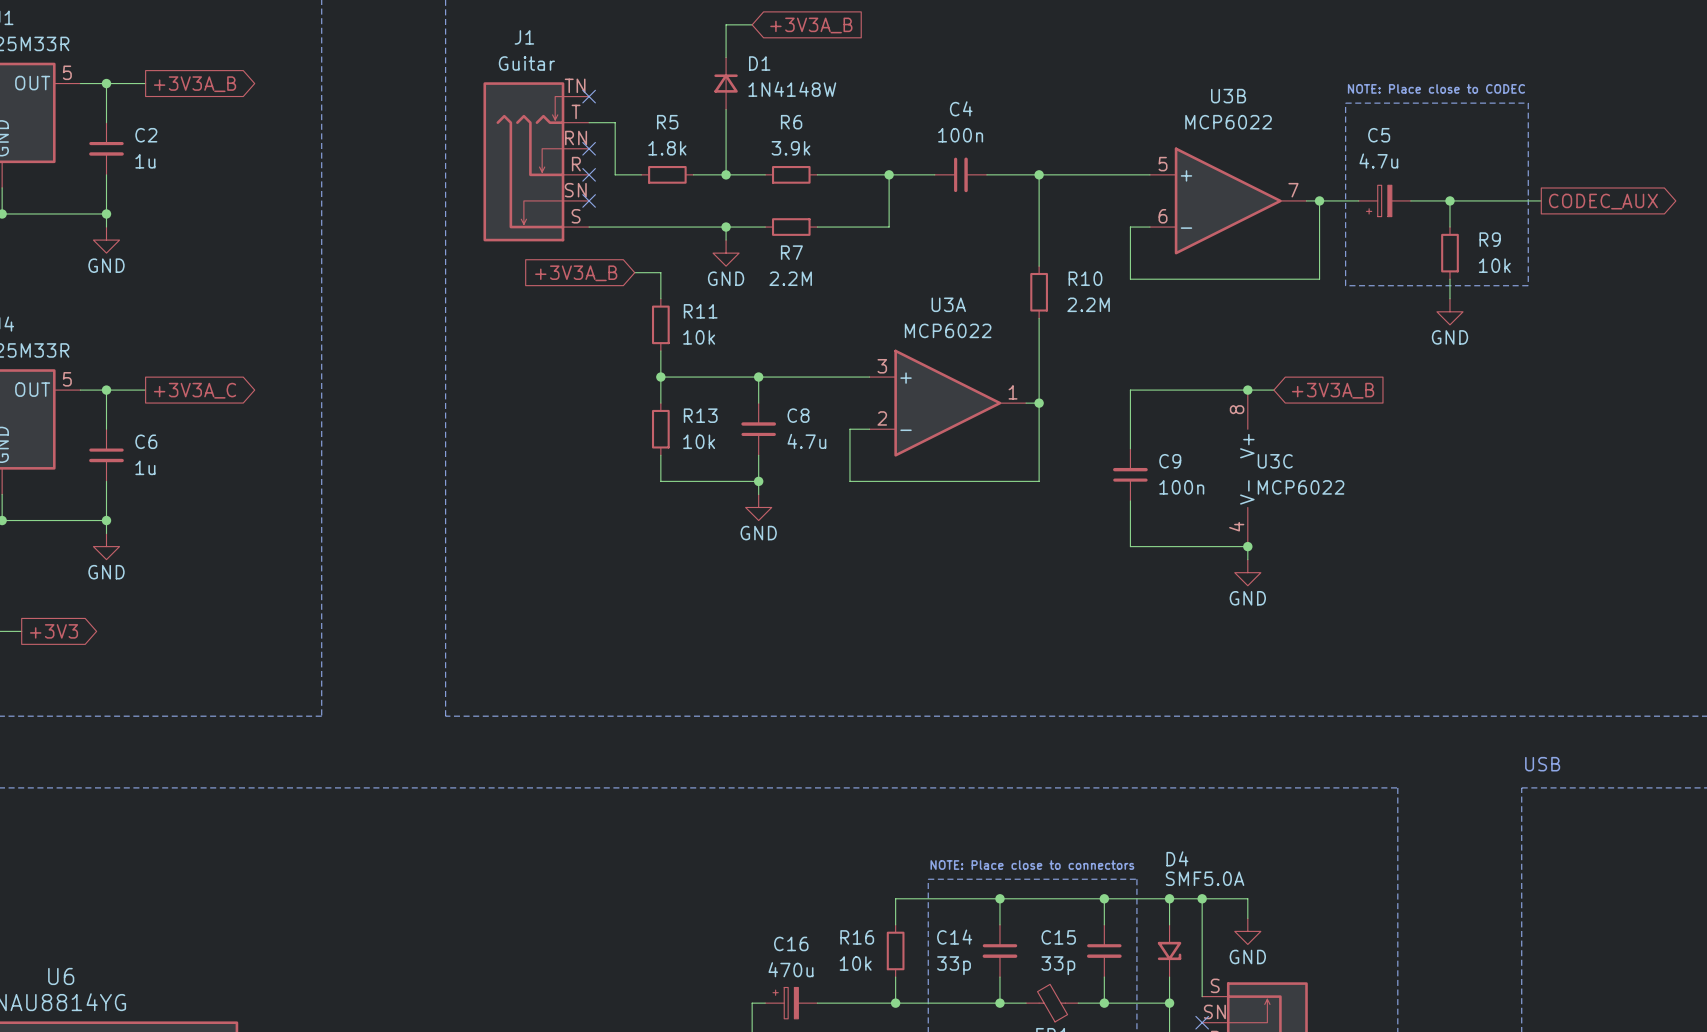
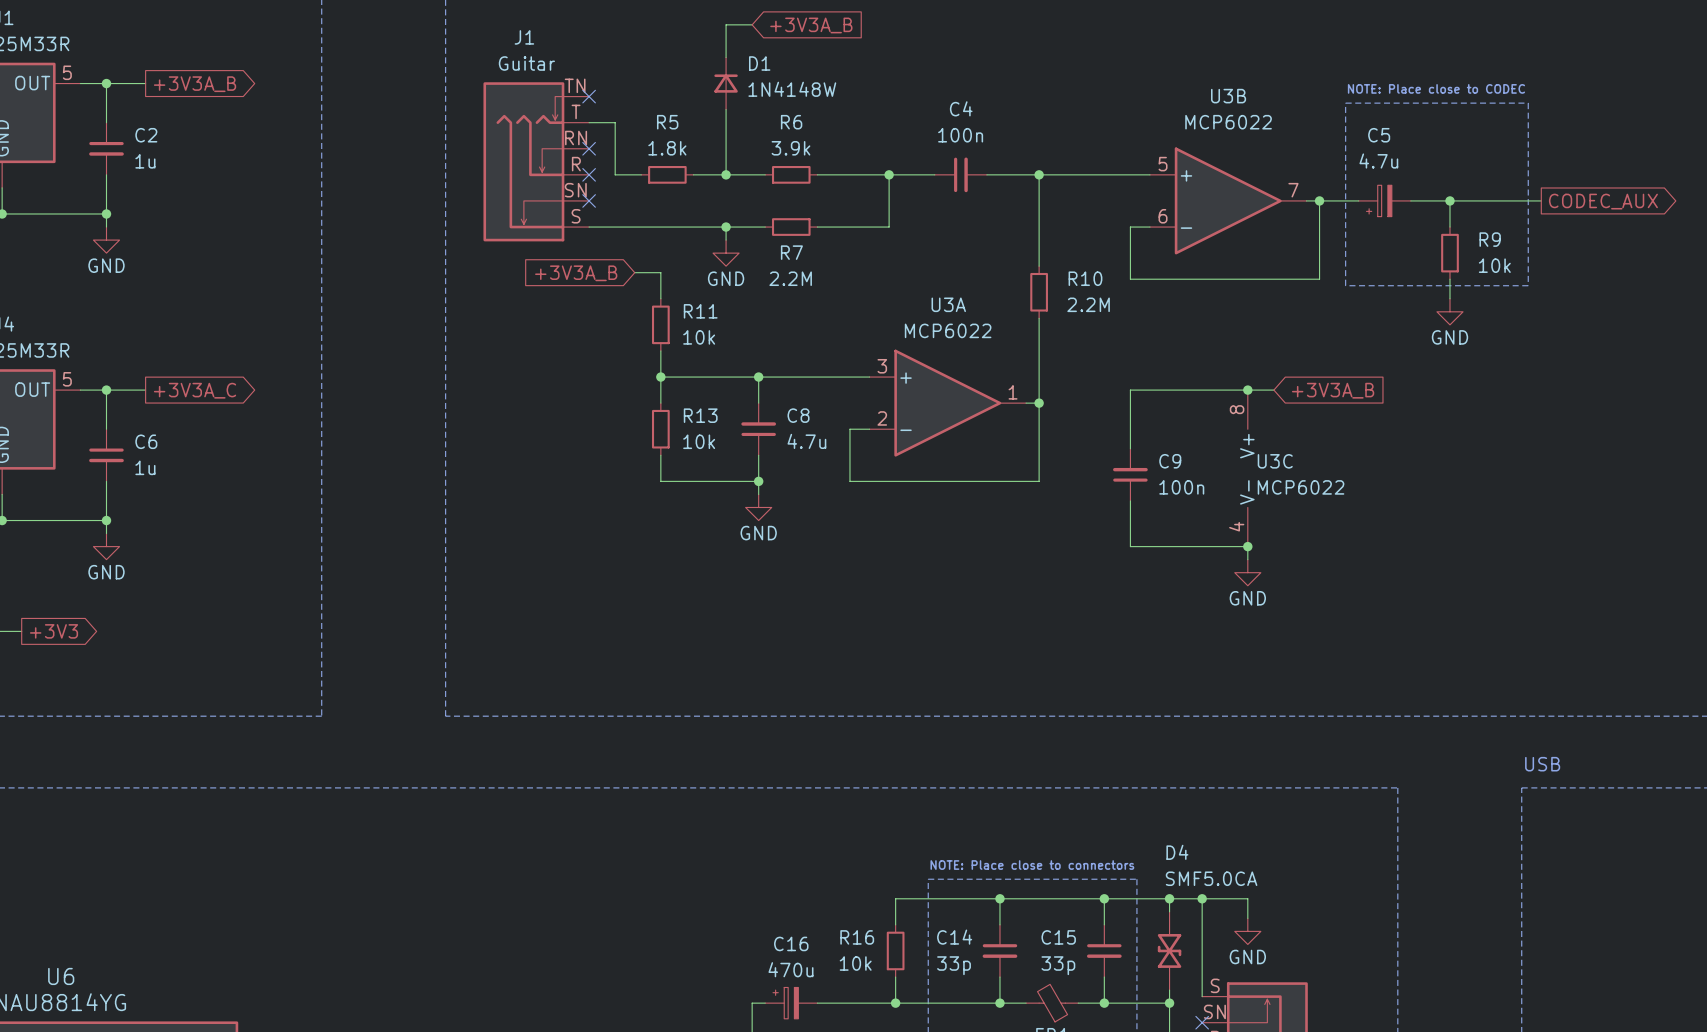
D4 value: SMF5.0A (1205, 878) -> SMF5.0CA (1211, 878)
D4 symbol: [1157, 924, 1182, 978] -> [1157, 911, 1182, 991]

